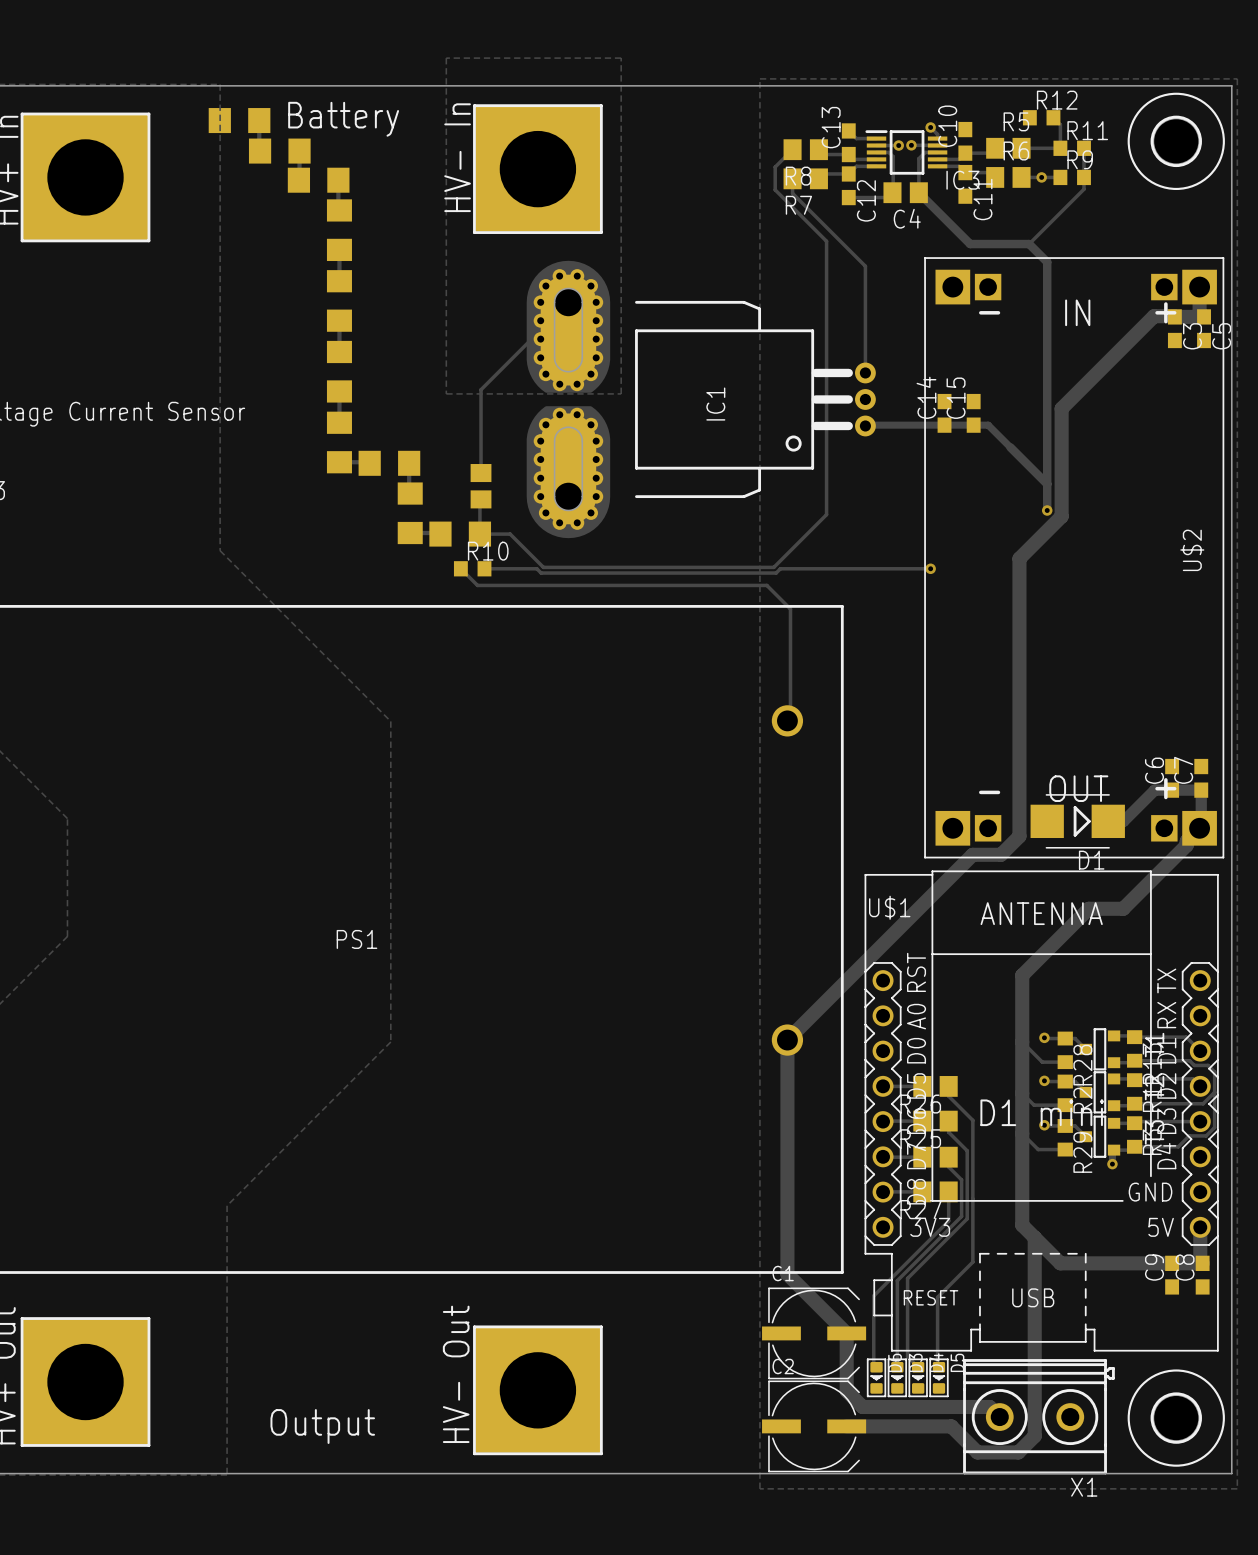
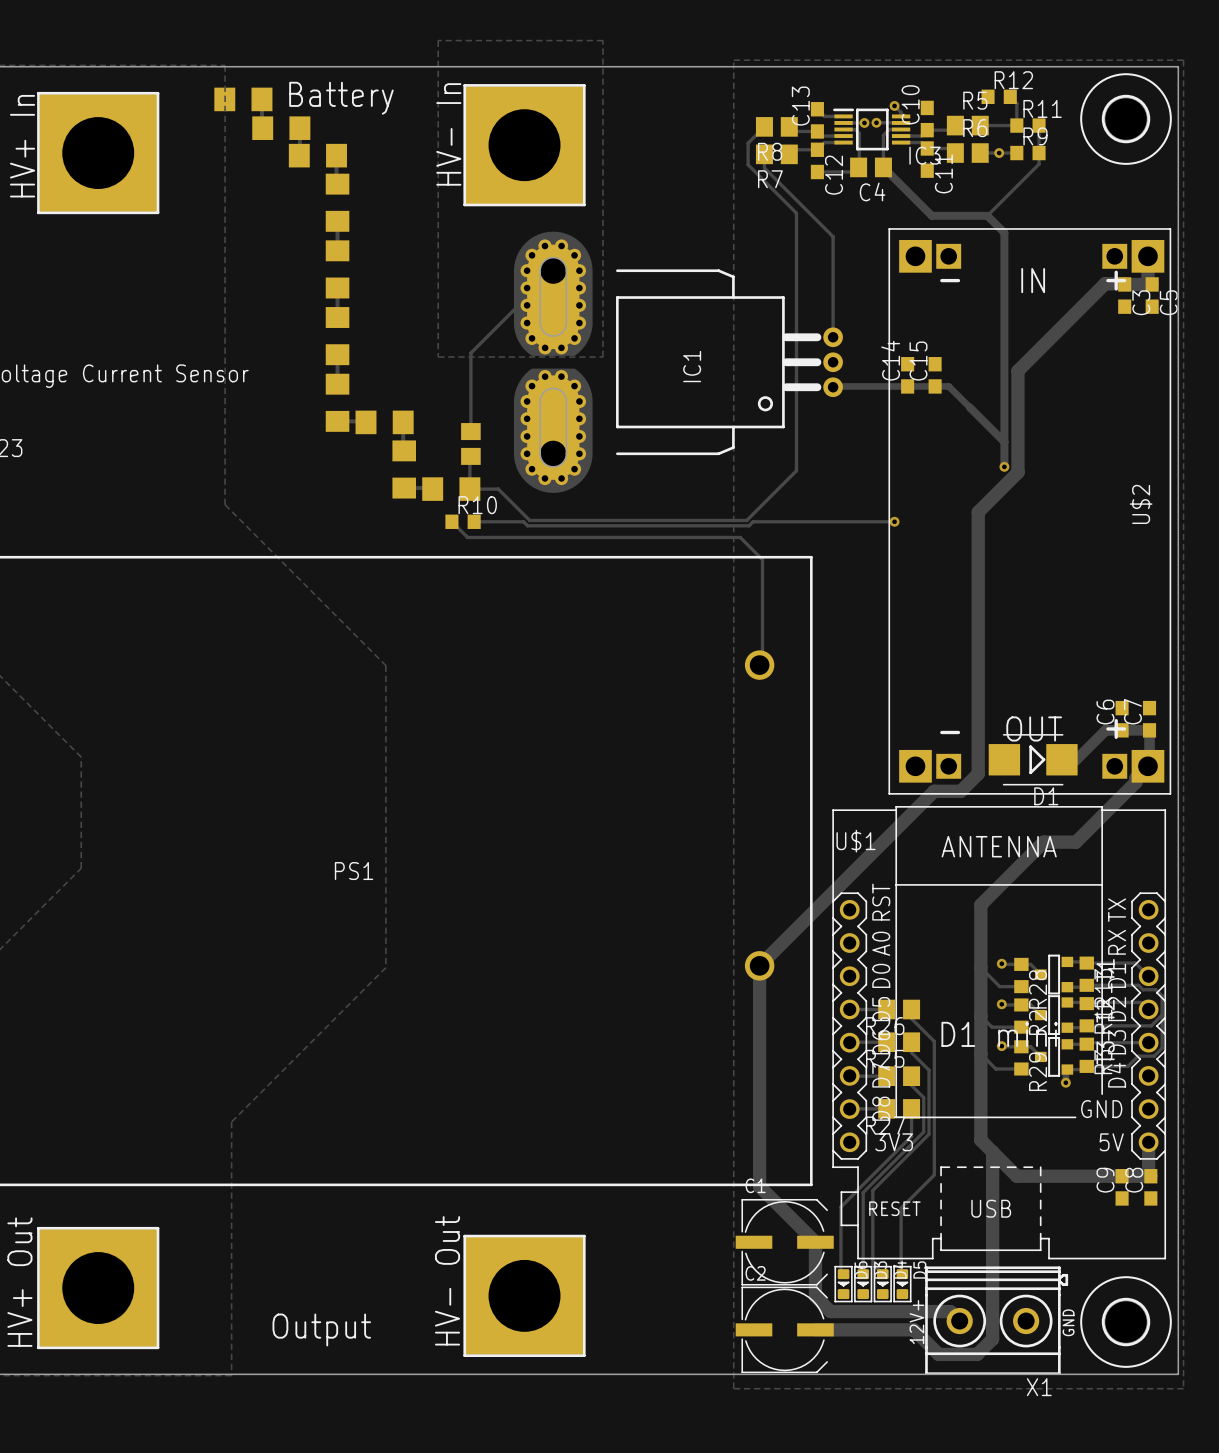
text: none -> 12V+ (916, 1322)
text: none -> GND (1068, 1322)

